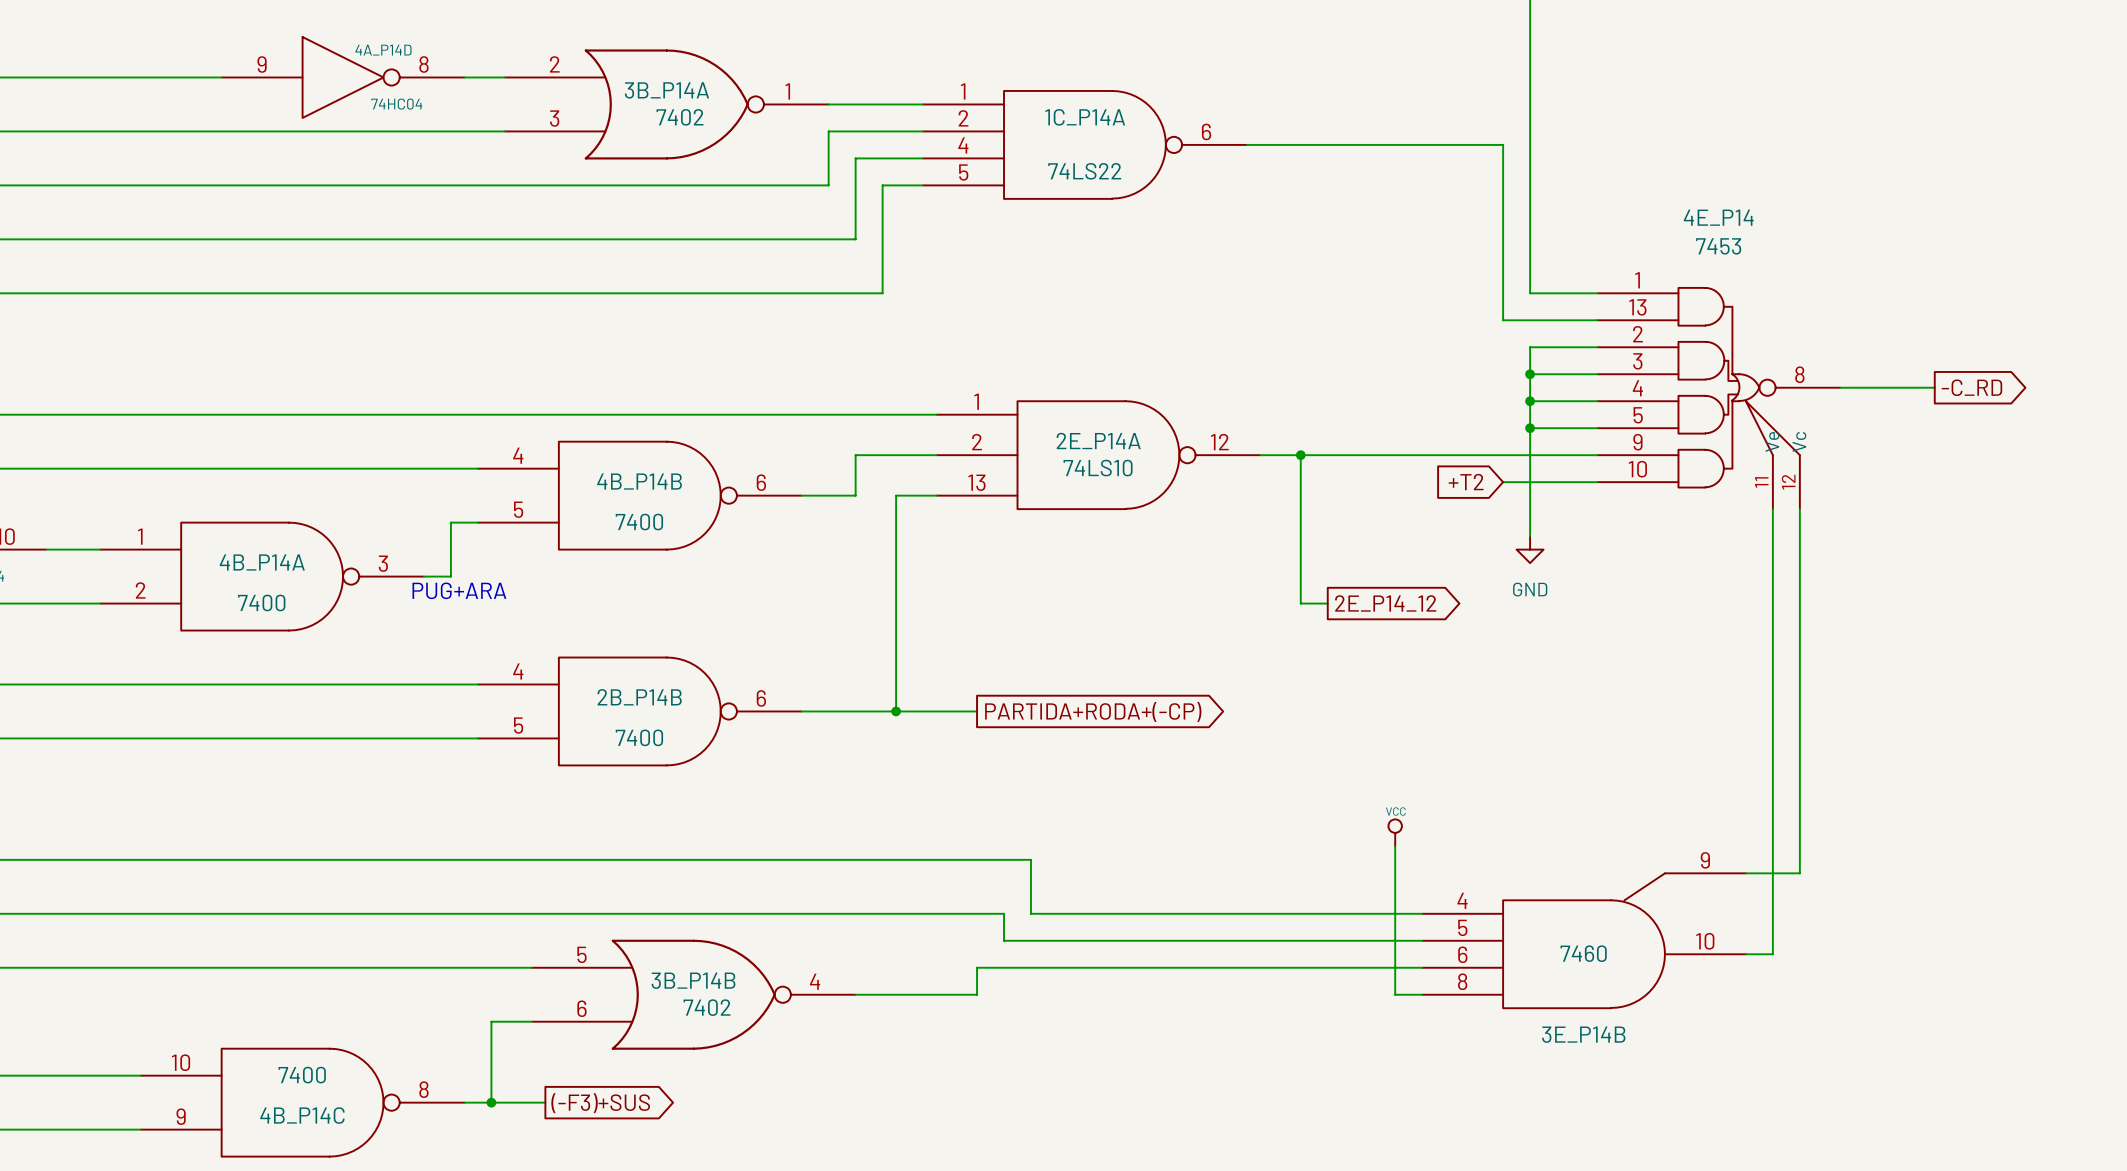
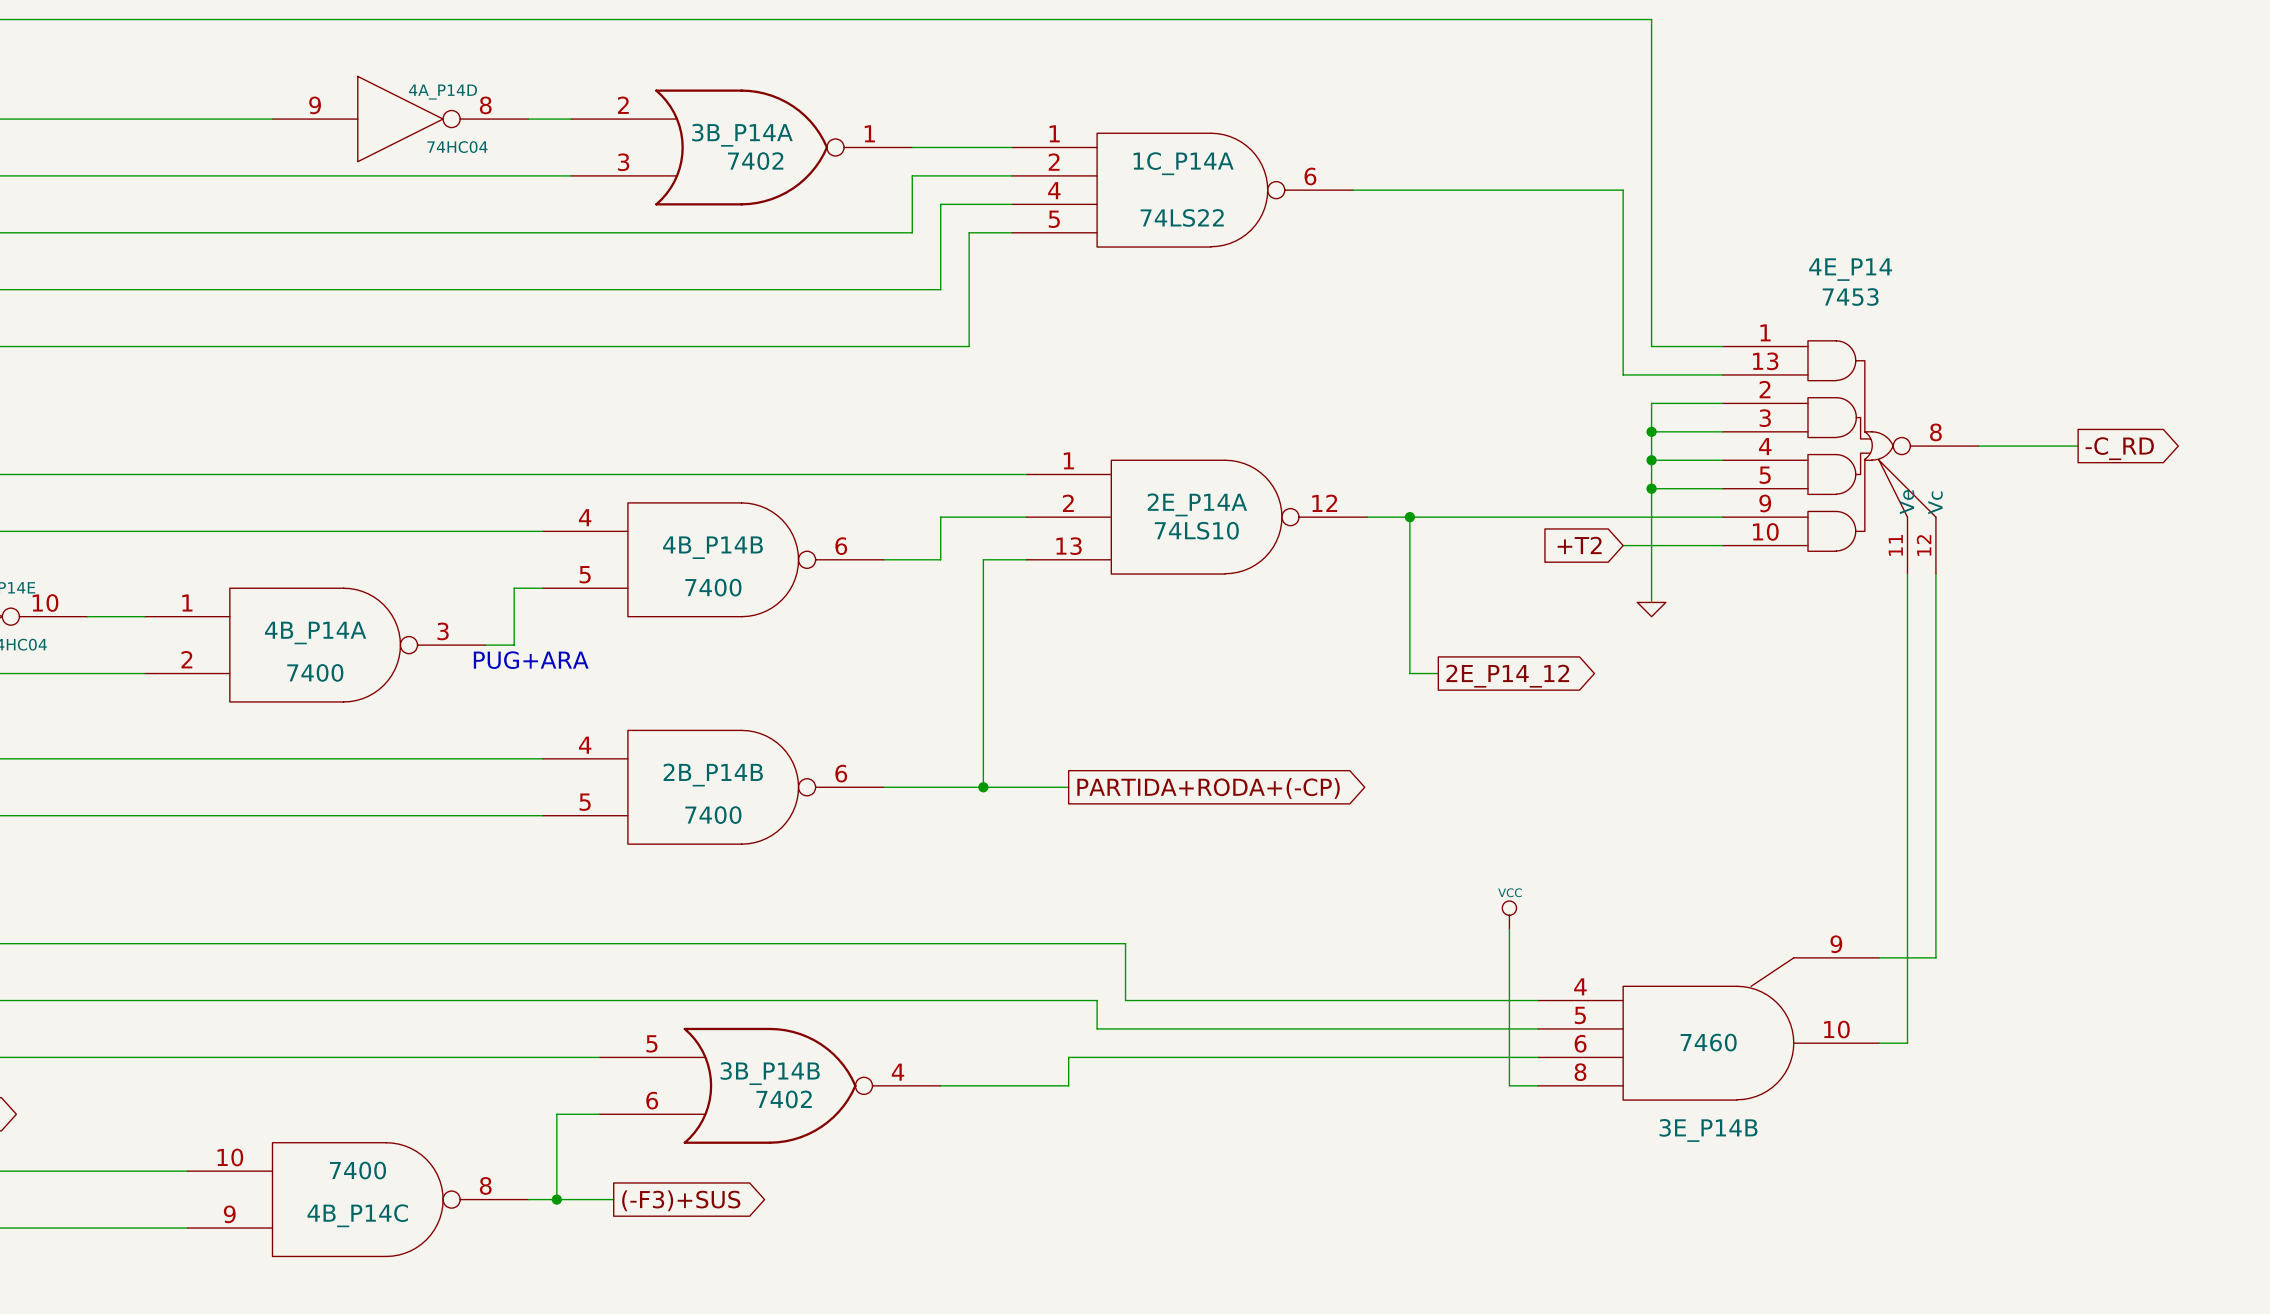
power symbol shape: [1516, 536, 1544, 564] -> [1637, 602, 1666, 617]
power symbol text: GND (1530, 589) -> none

